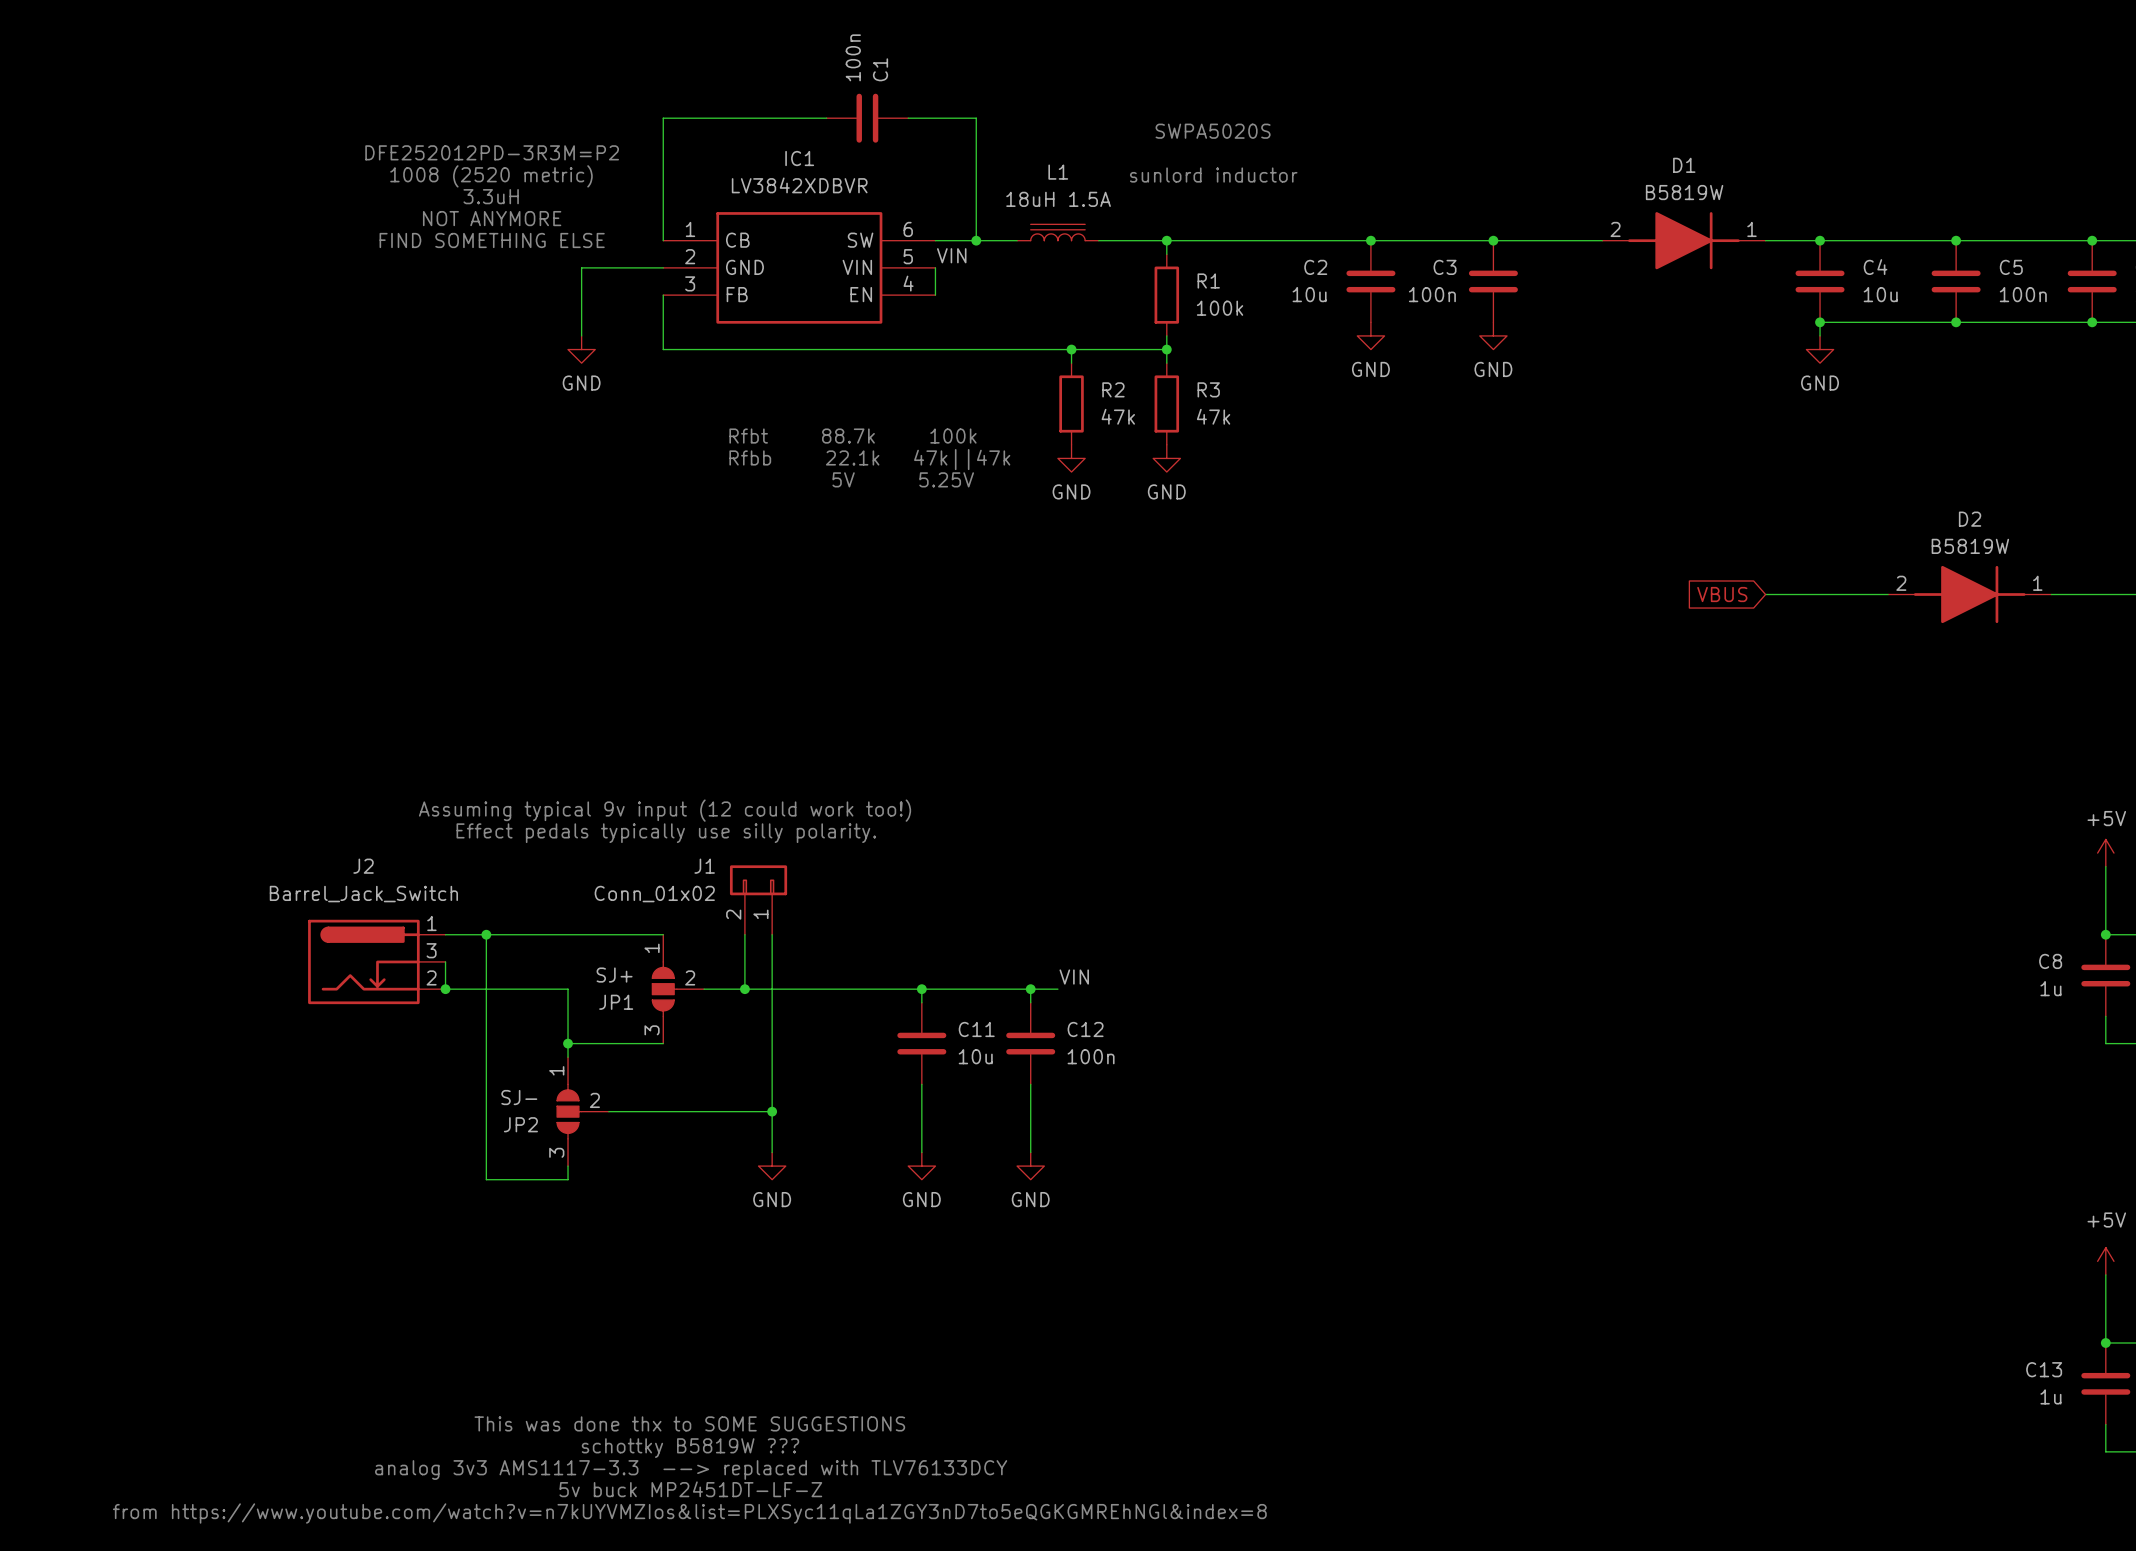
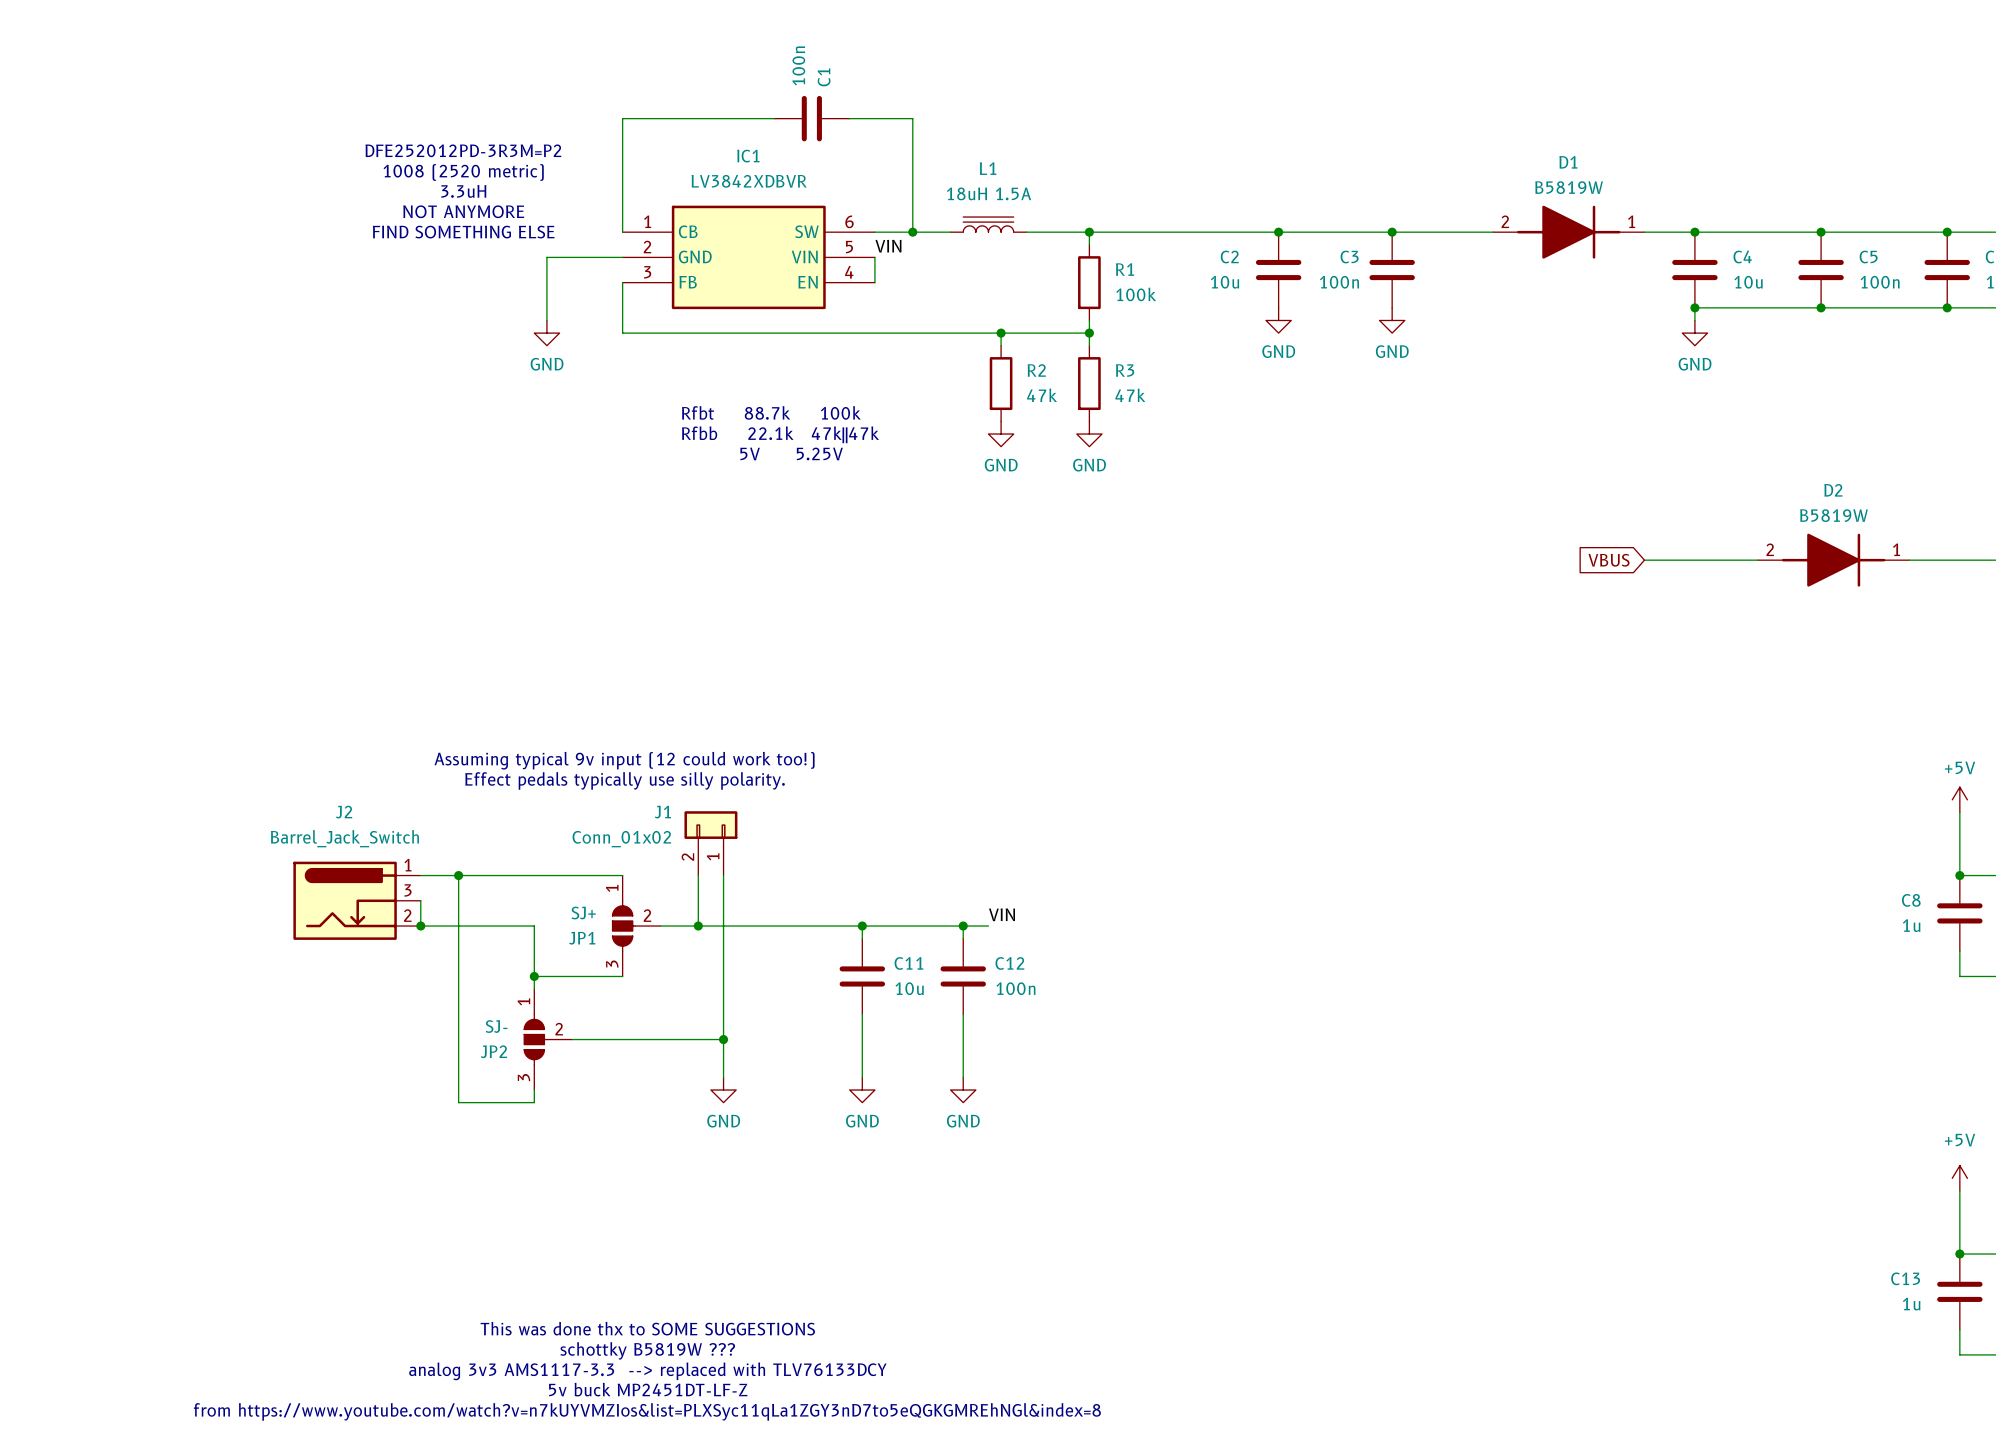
text: SWPA5020S (1213, 131) -> none
text: sunlord inductor (1213, 175) -> none

